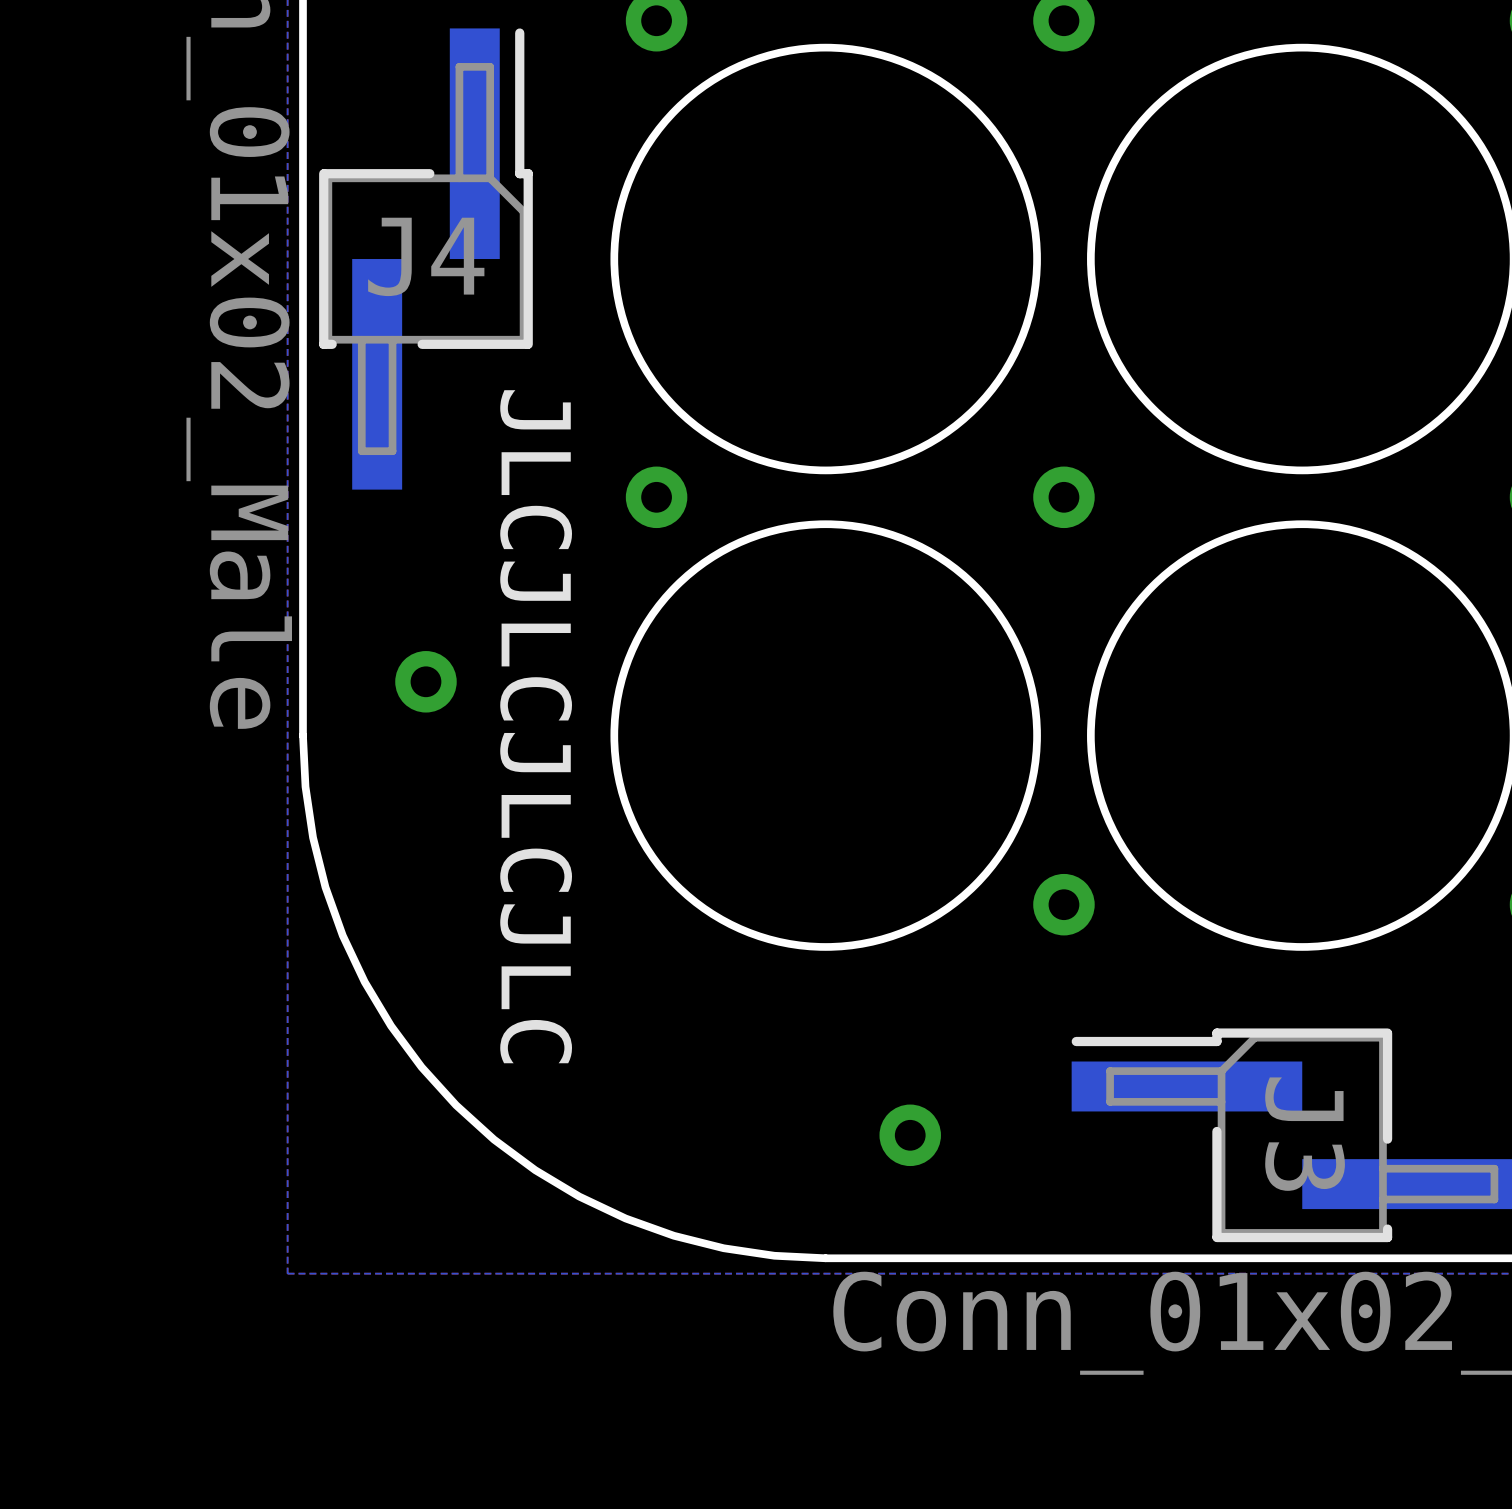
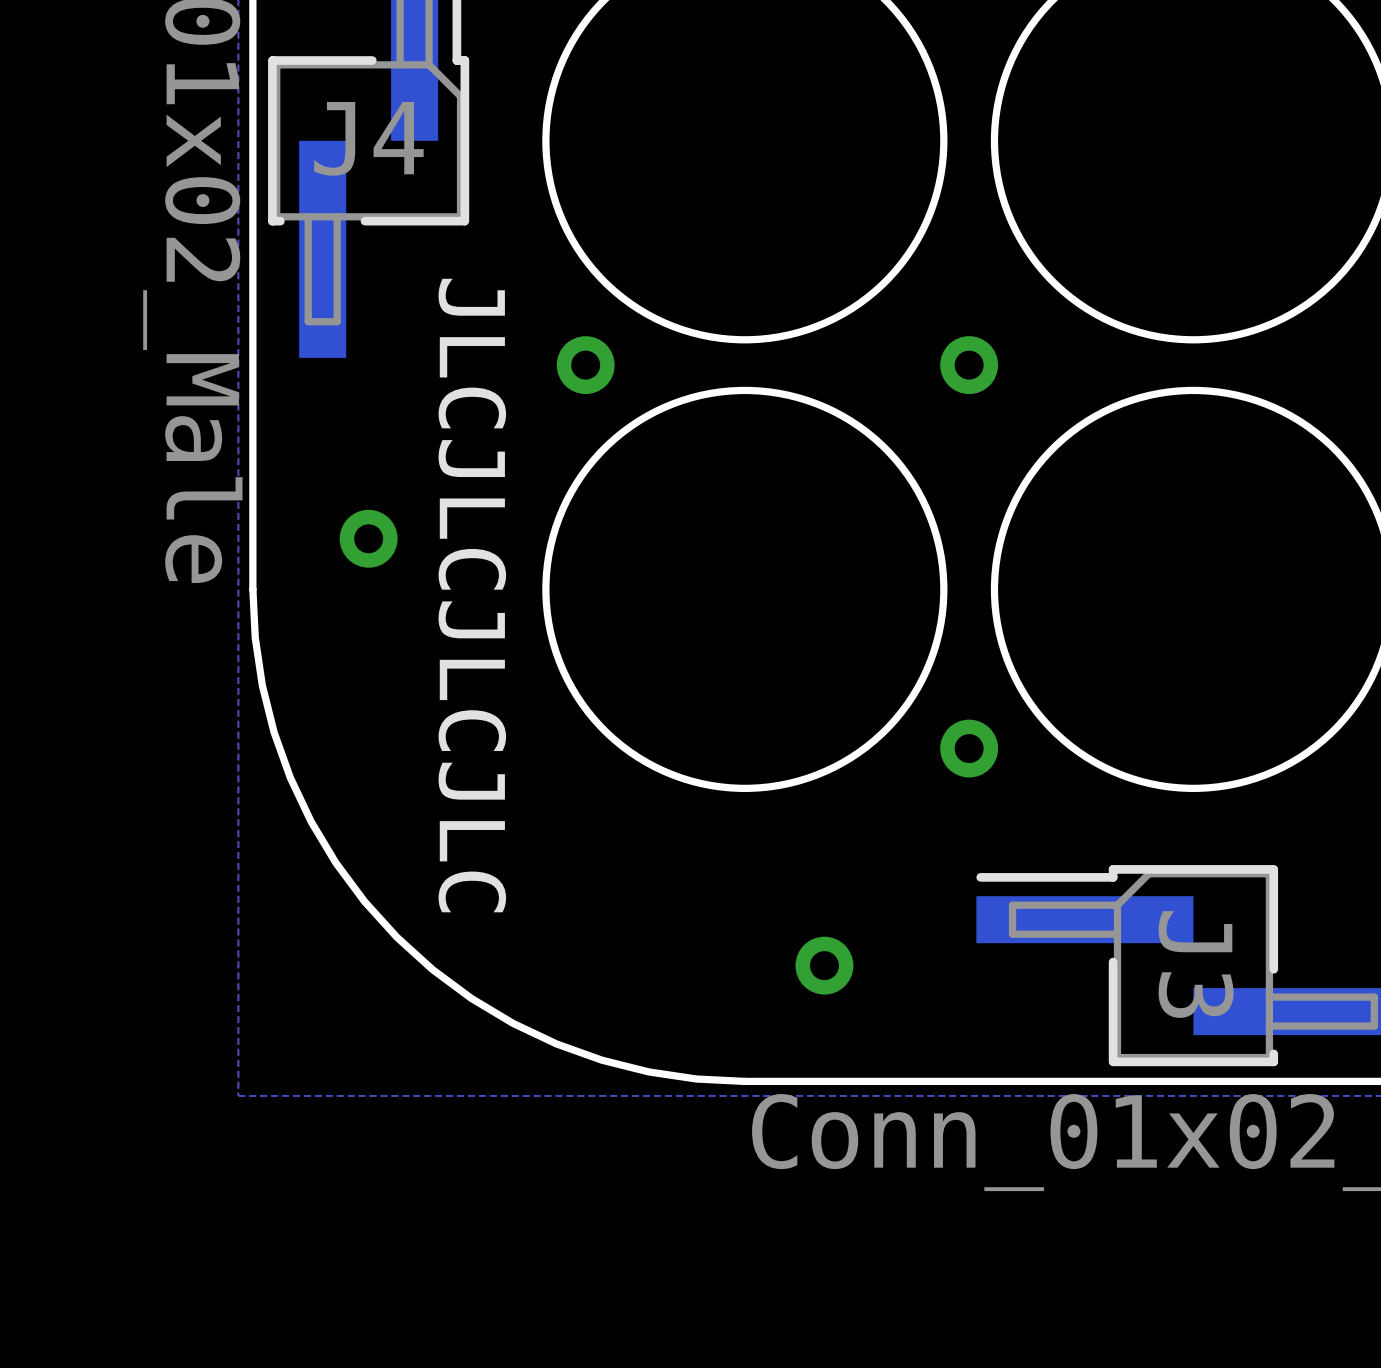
text position: JLCJLCJLCJLC (536, 726) -> JLCJLCJLCJLC (472, 595)

